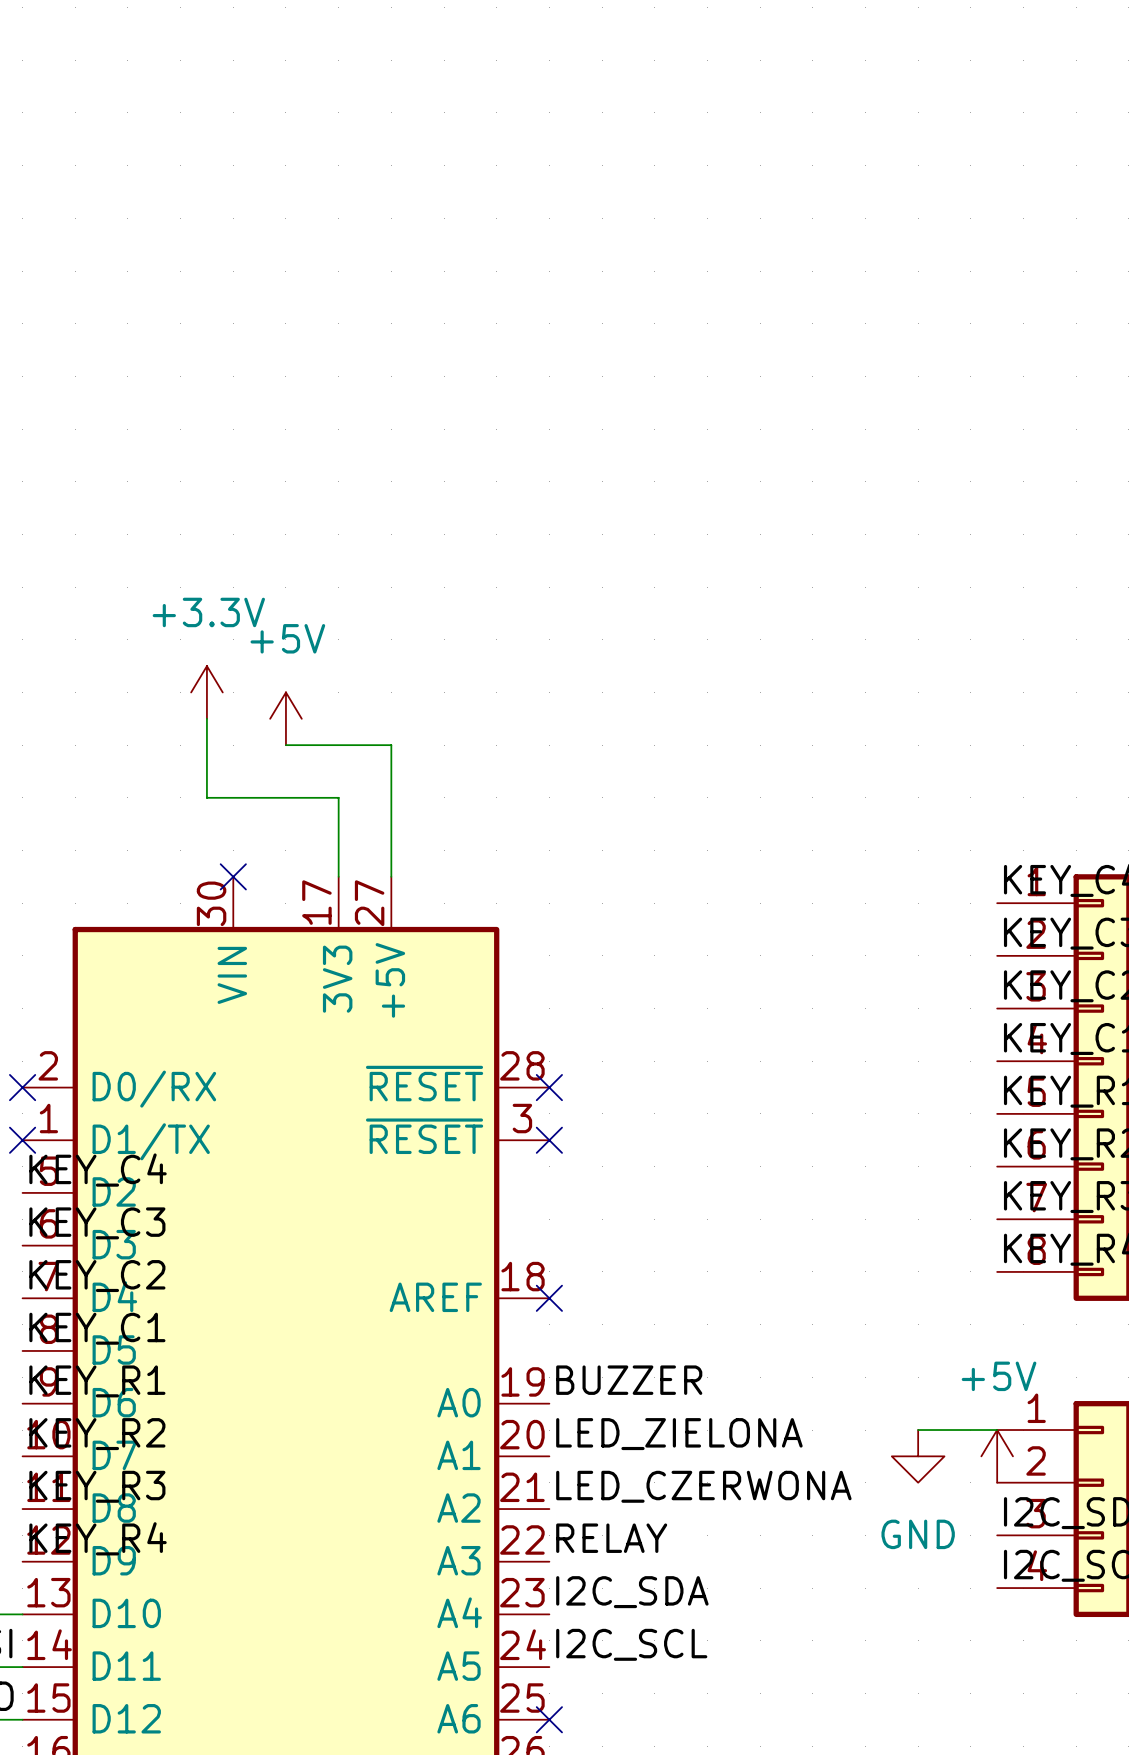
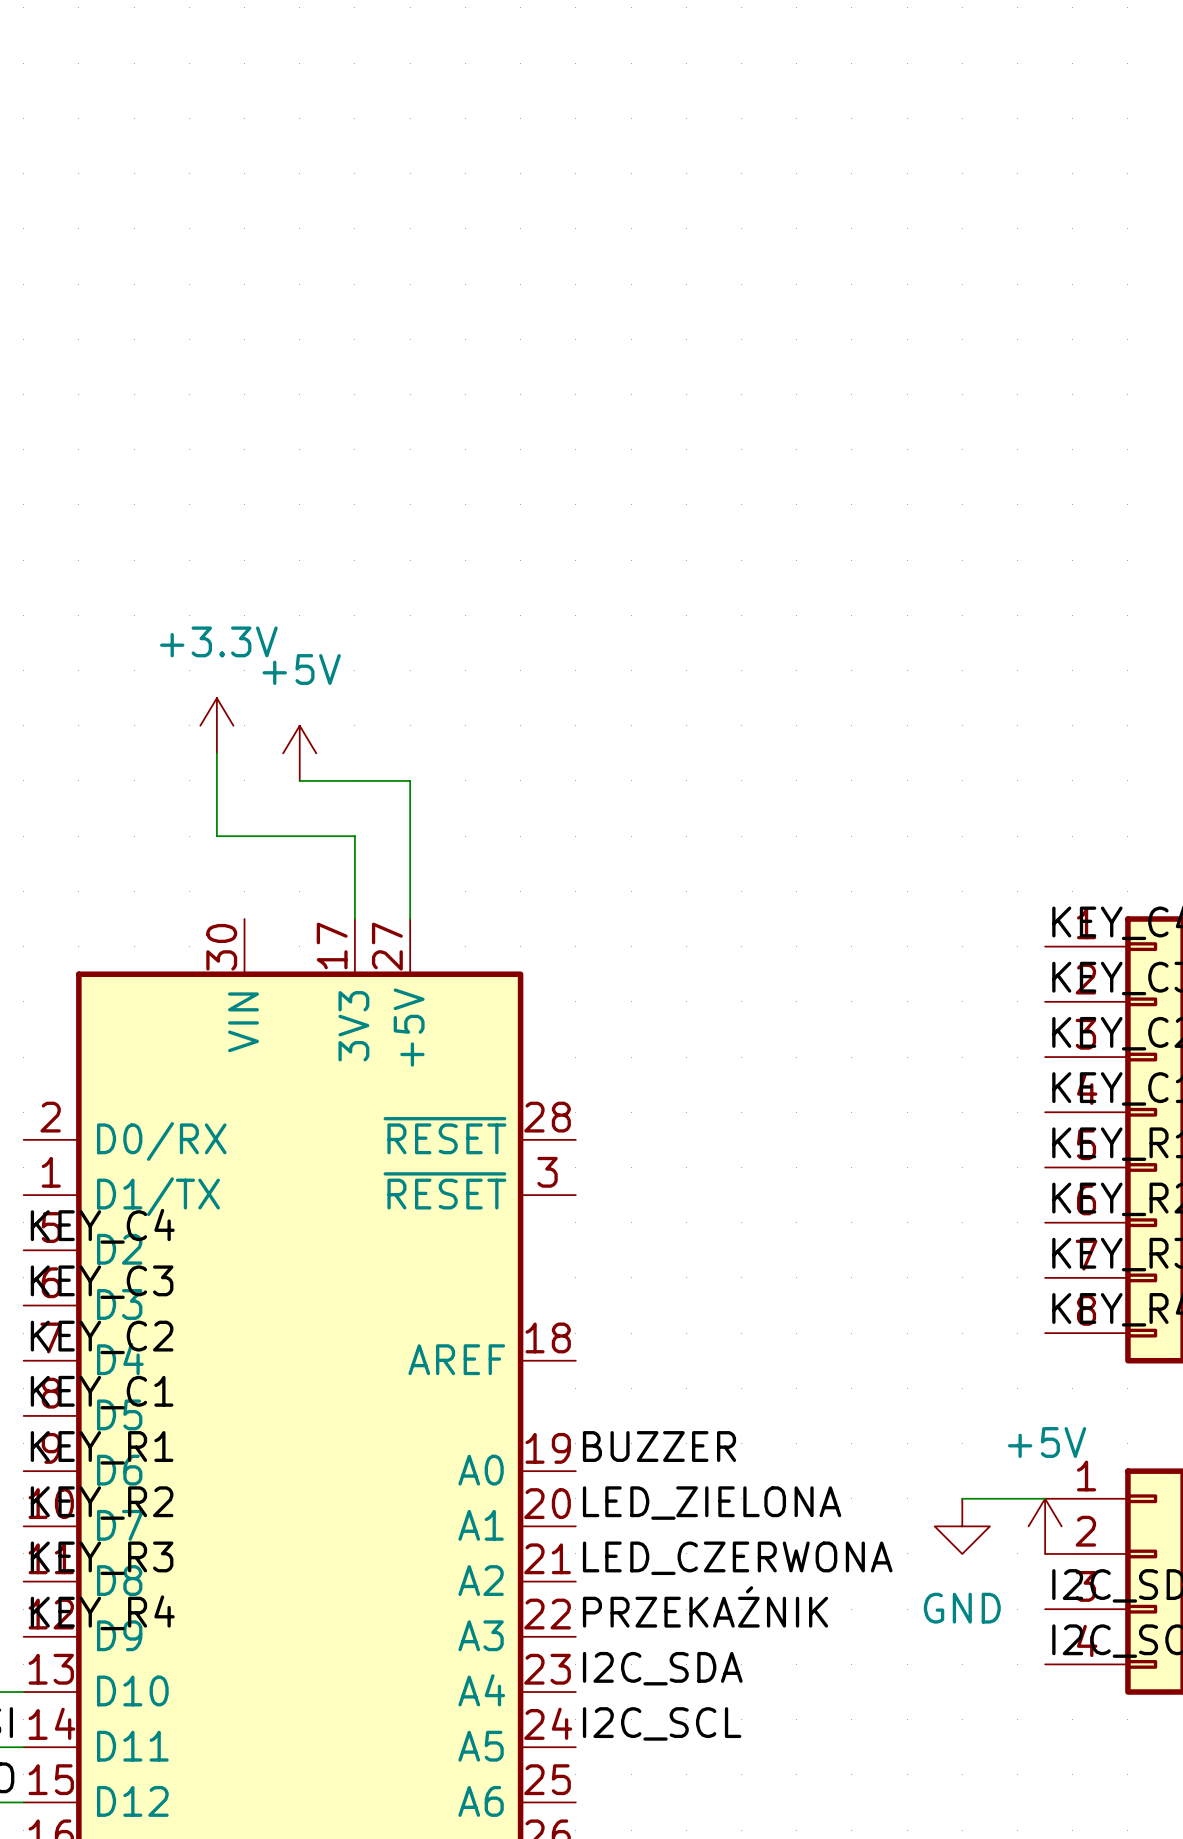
no-connect mark: (233, 876) -> none
no-connect mark: (22, 1087) -> none
no-connect mark: (549, 1087) -> none
no-connect mark: (22, 1140) -> none
no-connect mark: (549, 1140) -> none
no-connect mark: (549, 1298) -> none
label: RELAY (611, 1538) -> PRZEKAŹNIK (705, 1606)
no-connect mark: (549, 1719) -> none

